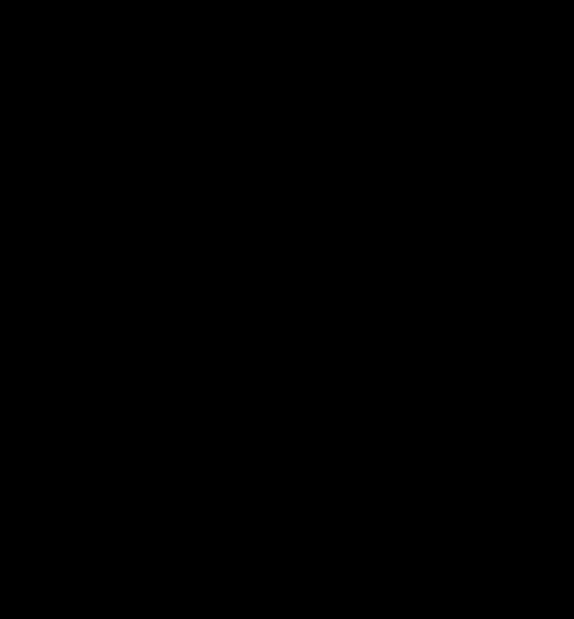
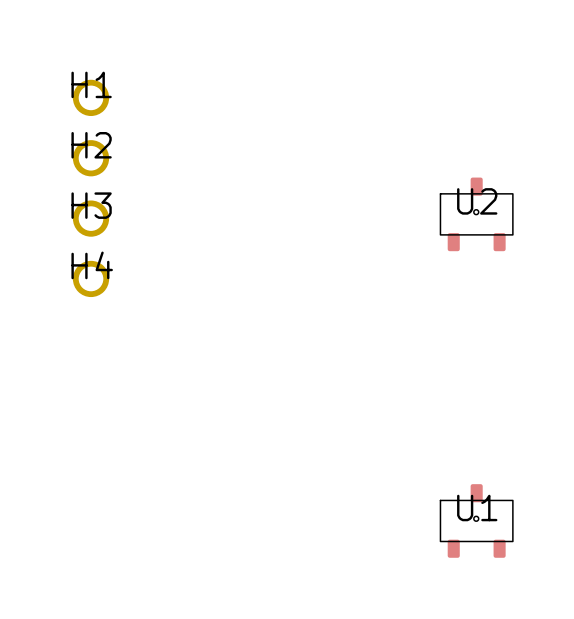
H1: none -> (91, 97)
H2: none -> (91, 158)
U2: none -> (476, 214)
H3: none -> (91, 218)
H4: none -> (91, 278)
U1: none -> (476, 520)

